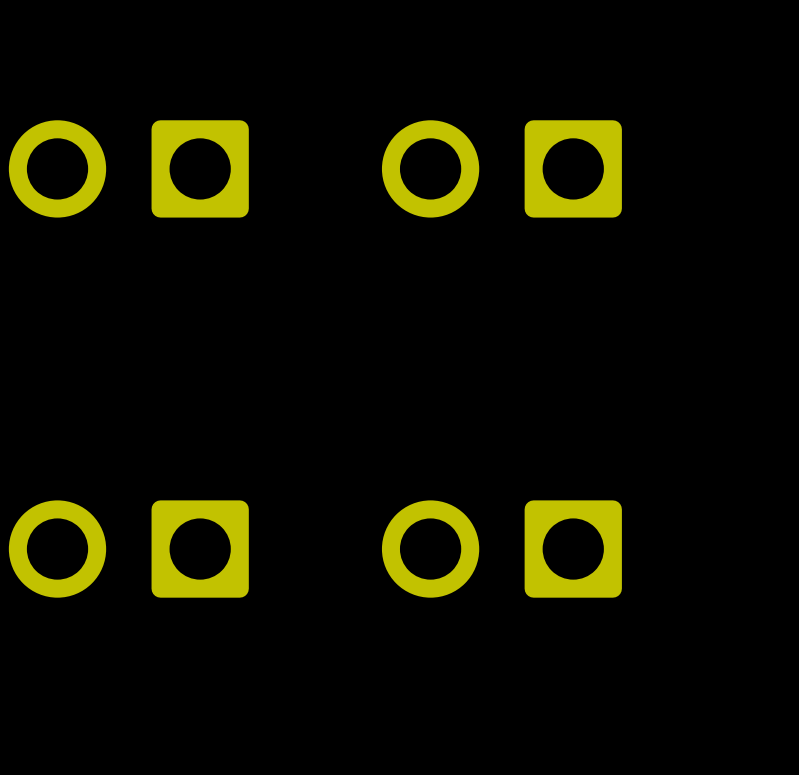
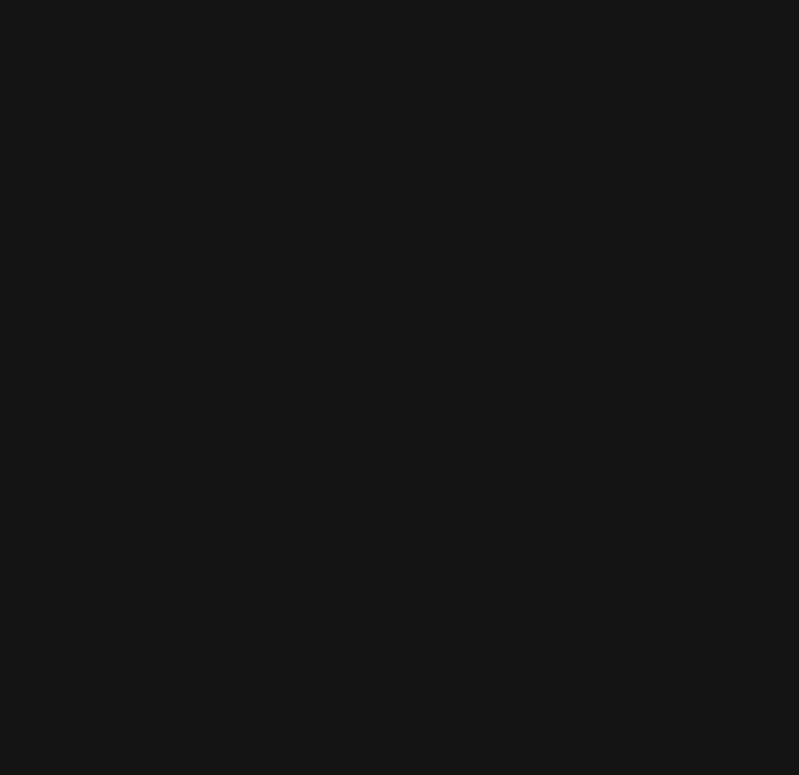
part: (128, 168) -> none
part: (501, 168) -> none
part: (128, 549) -> none
part: (501, 549) -> none

